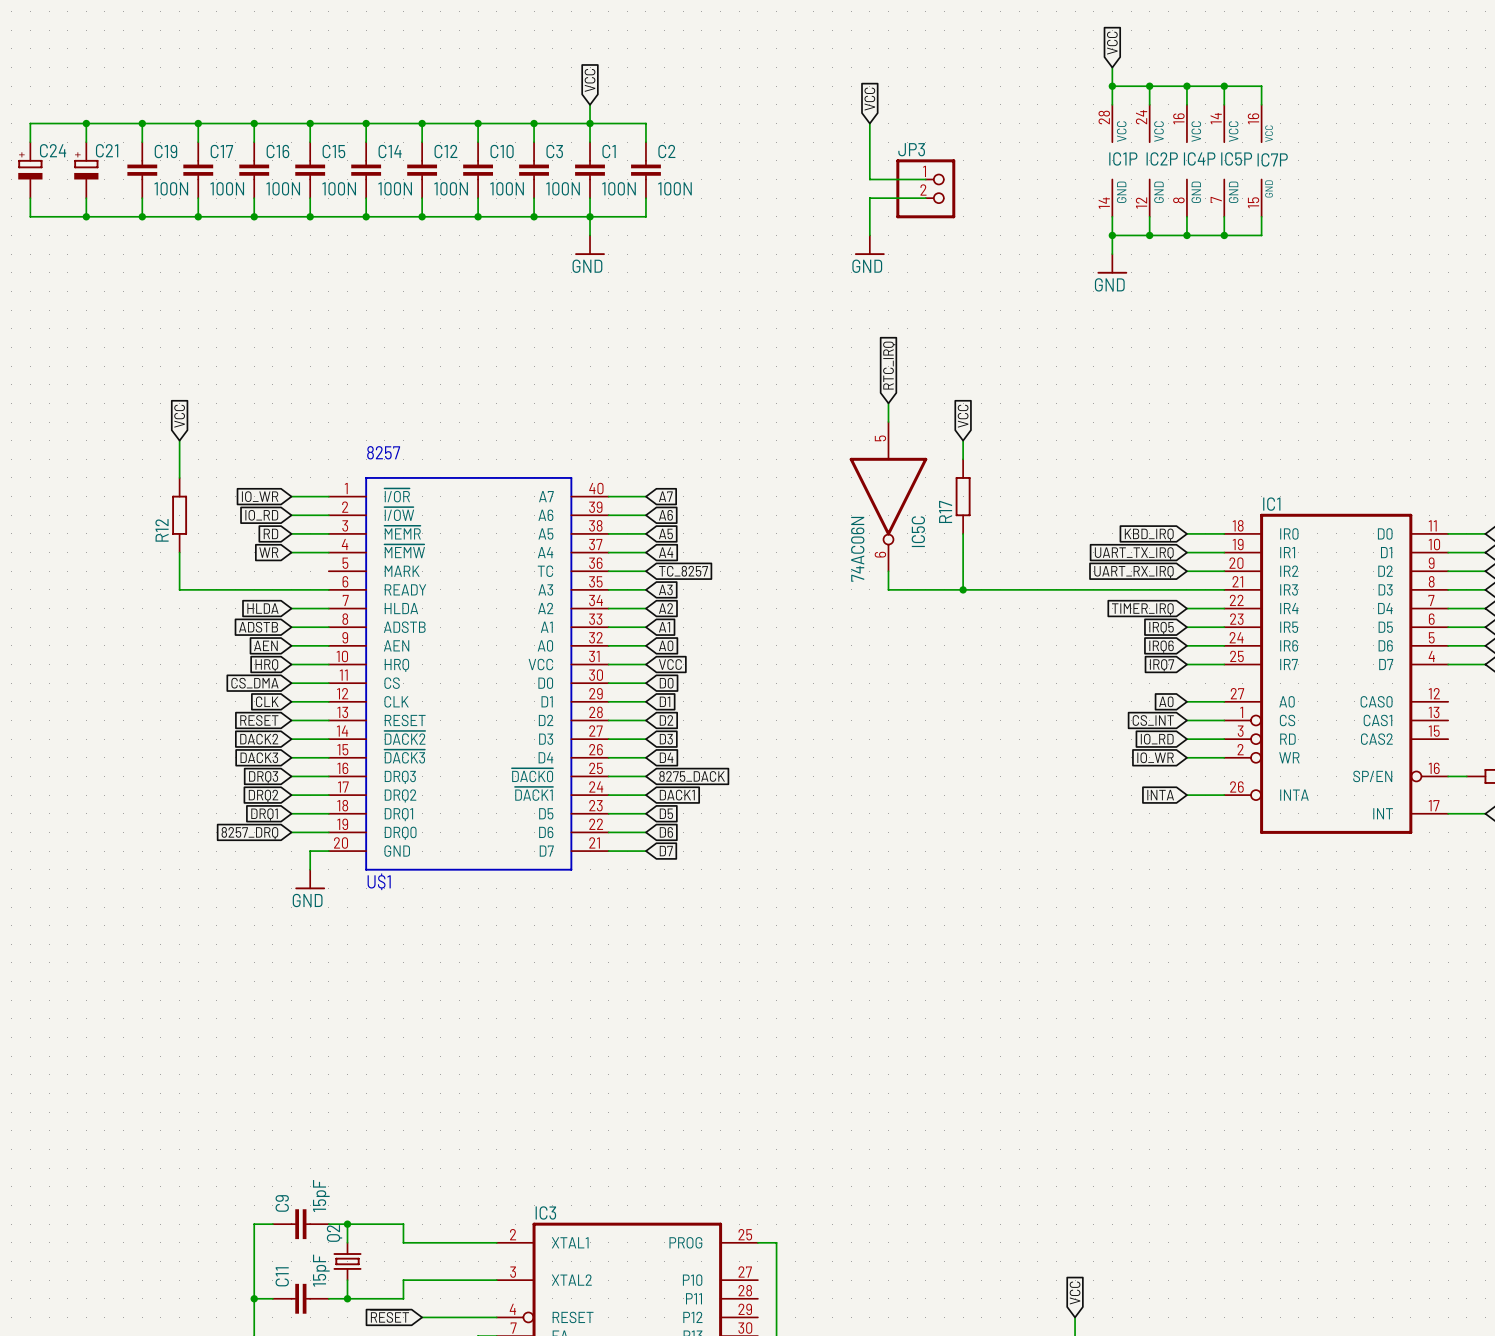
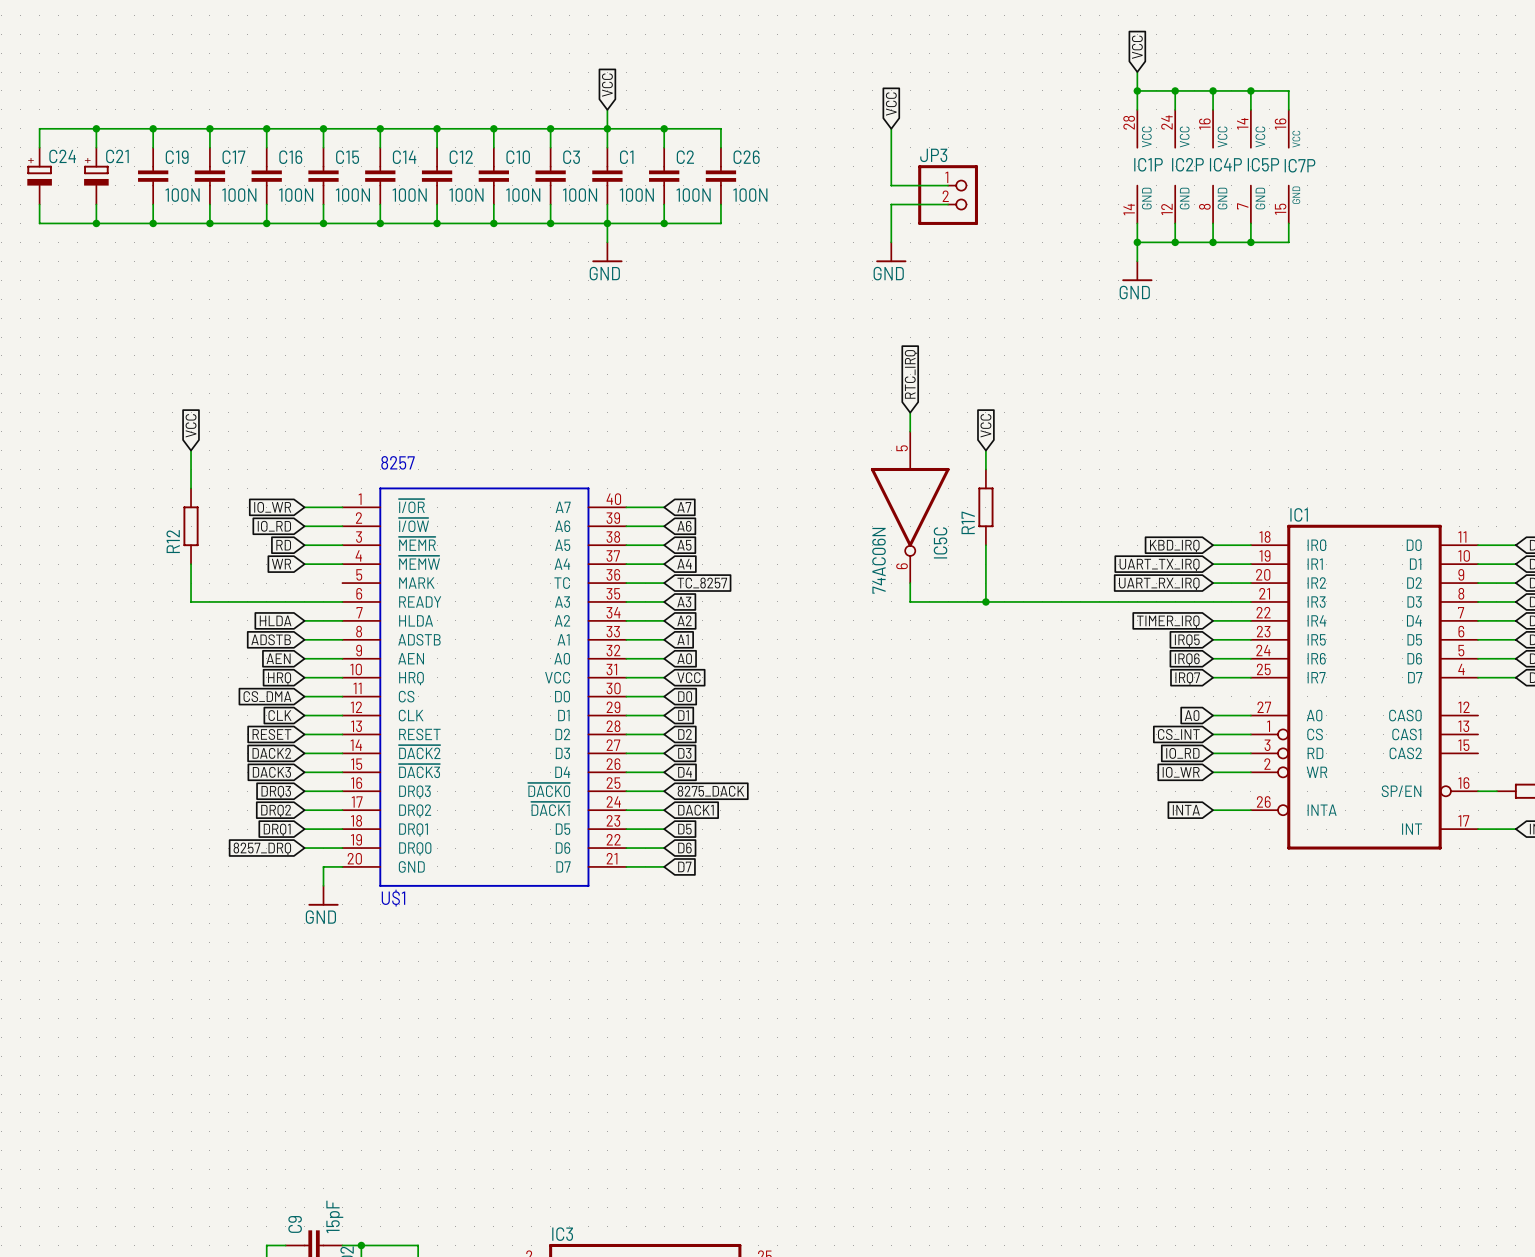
wire: none -> (664, 128) (720, 128) (720, 147)
junction: none -> (664, 128)
C26: none -> 100N (720, 176)
wire: none -> (720, 204) (720, 223) (664, 223)
junction: none -> (664, 223)

